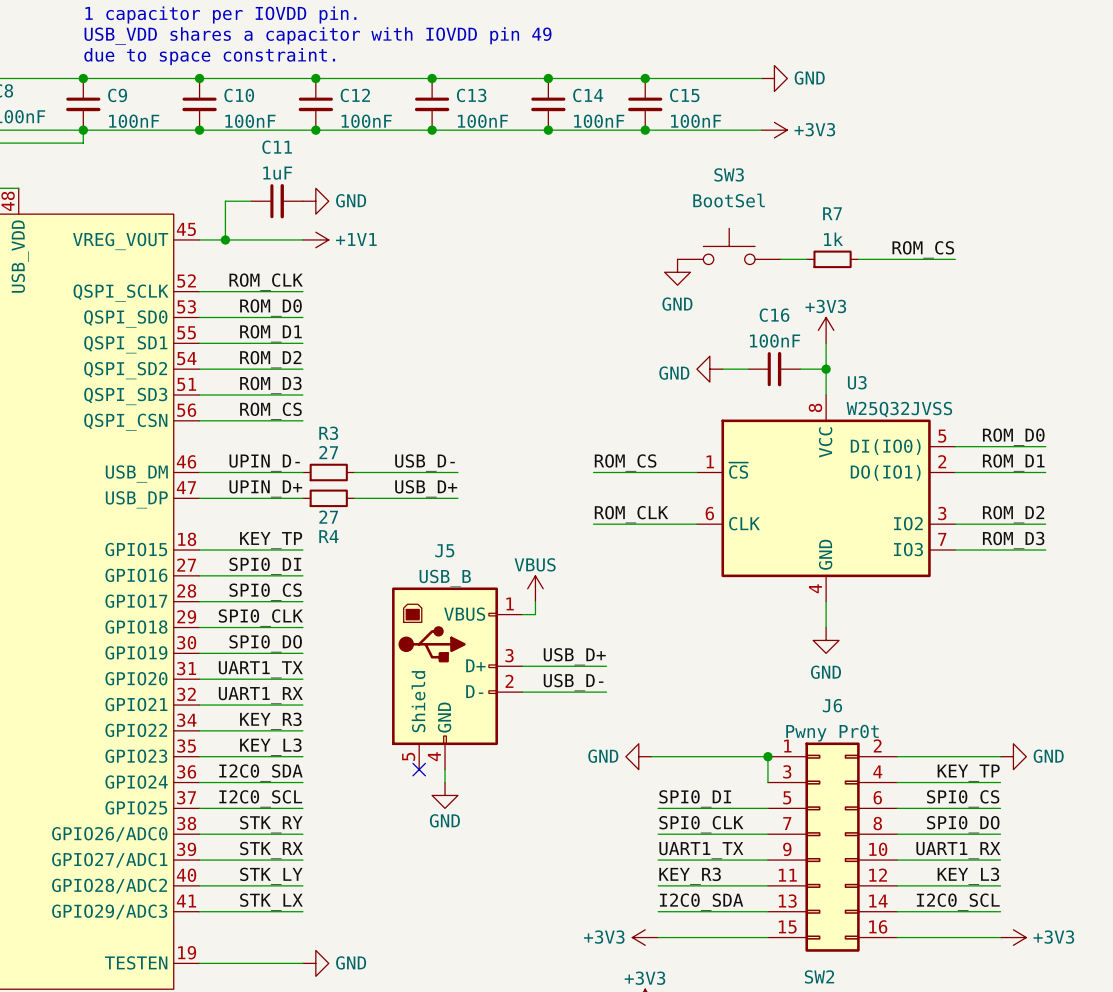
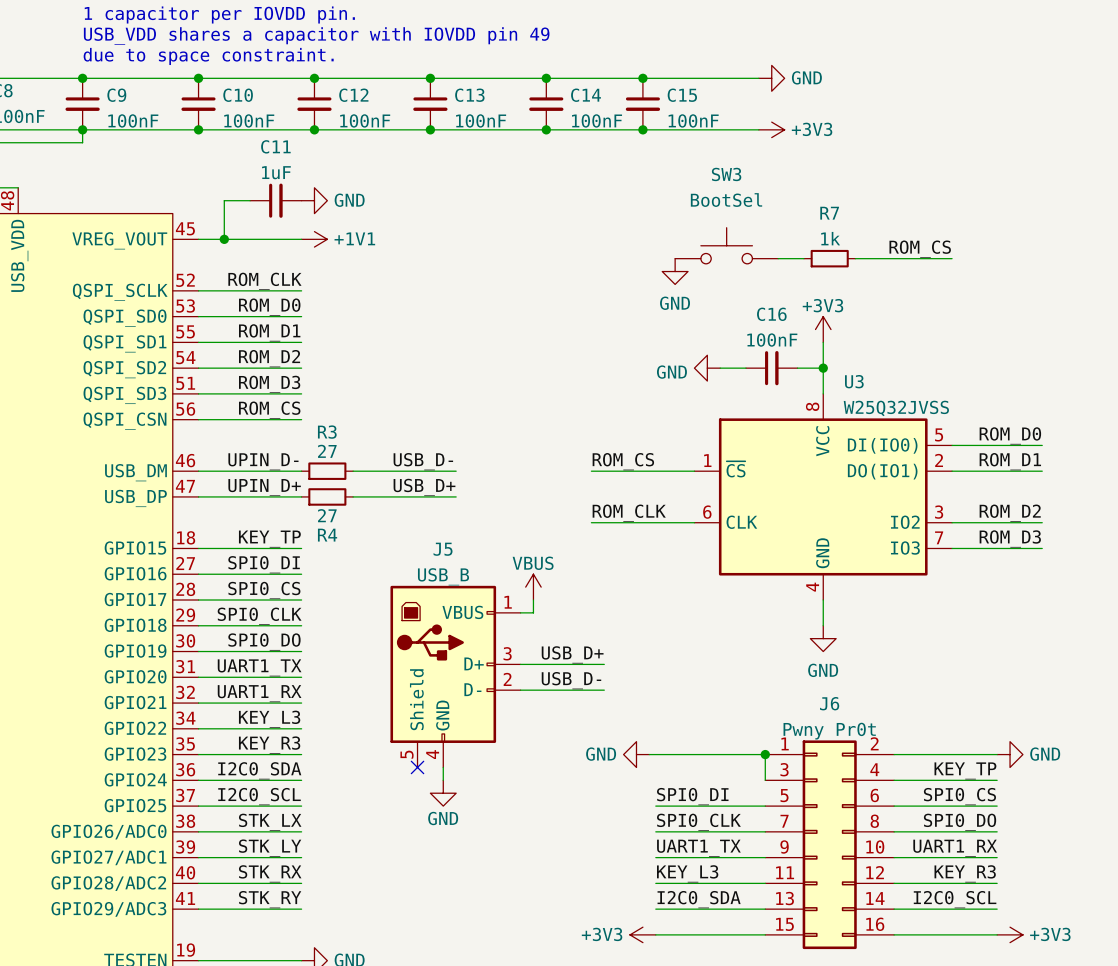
label: KEY_R3 (270, 721) -> KEY_L3 (269, 719)
label: KEY_L3 (270, 747) -> KEY_R3 (269, 745)
label: STK_RY (271, 824) -> STK_LX (270, 822)
label: STK_RX (271, 850) -> STK_LY (270, 848)
label: STK_LY (271, 876) -> STK_RX (270, 873)
label: KEY_R3 (690, 876) -> KEY_L3 (687, 873)
label: KEY_L3 (968, 876) -> KEY_R3 (965, 873)
label: STK_LX (271, 902) -> STK_RY (270, 899)

